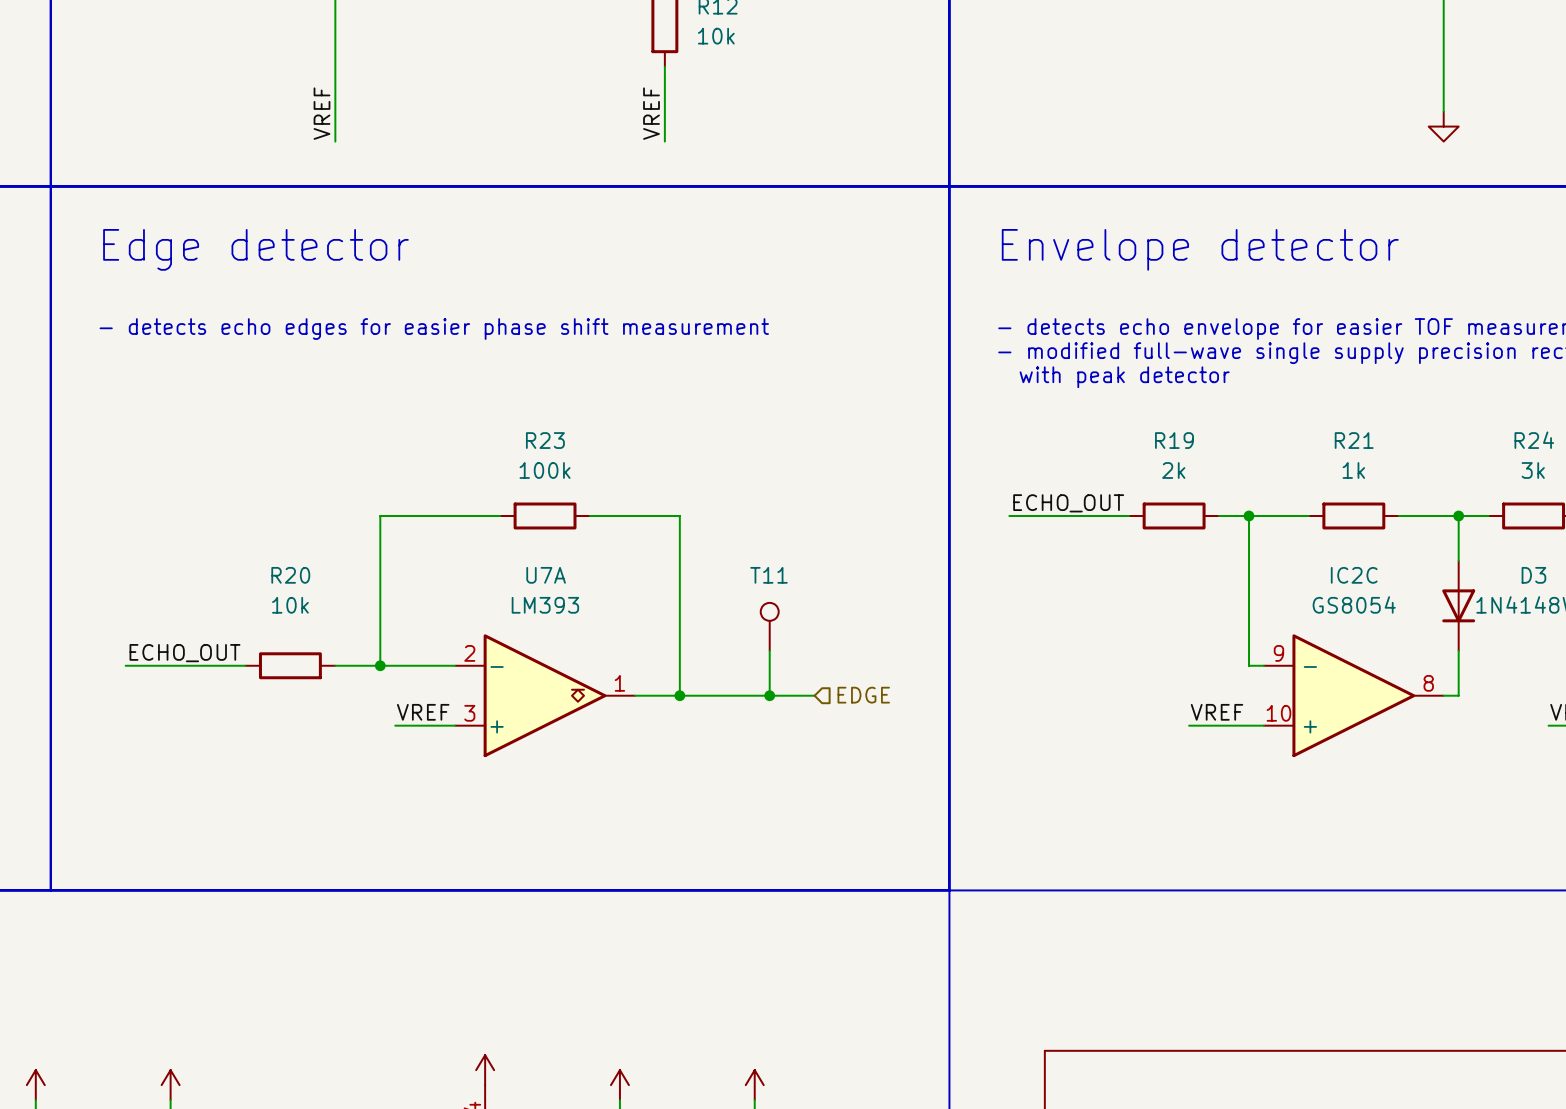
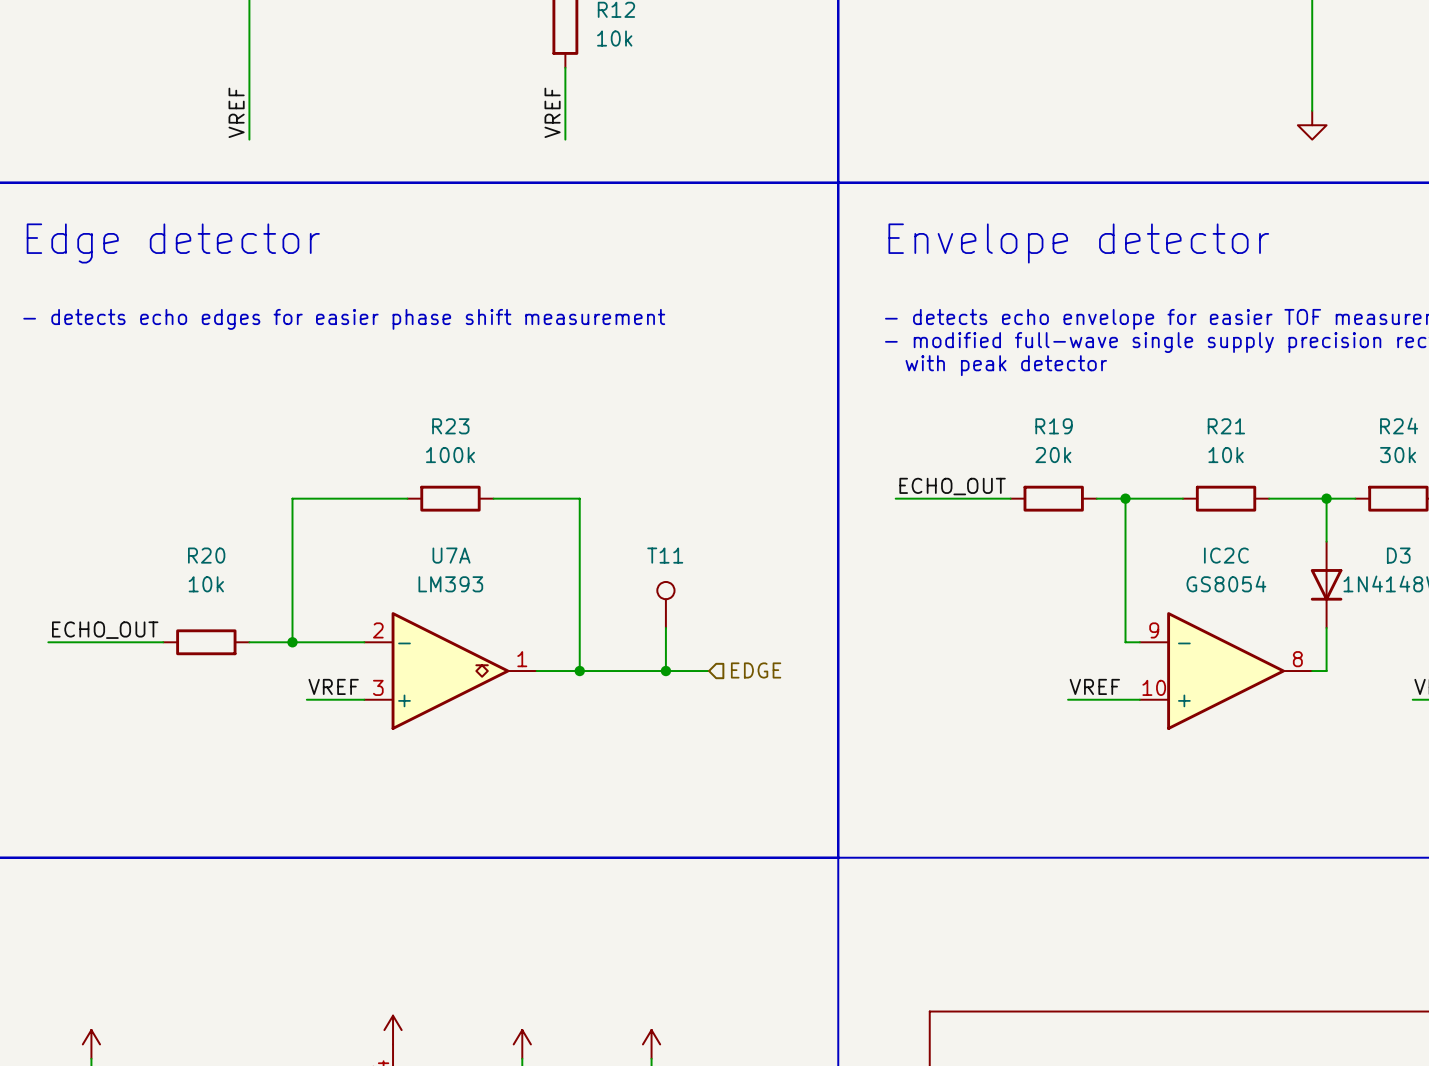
R19 value: 2k (1173, 470) -> 20k (1053, 455)
R21 value: 1k (1353, 470) -> 10k (1226, 455)
R24 value: 3k (1533, 470) -> 30k (1398, 455)

